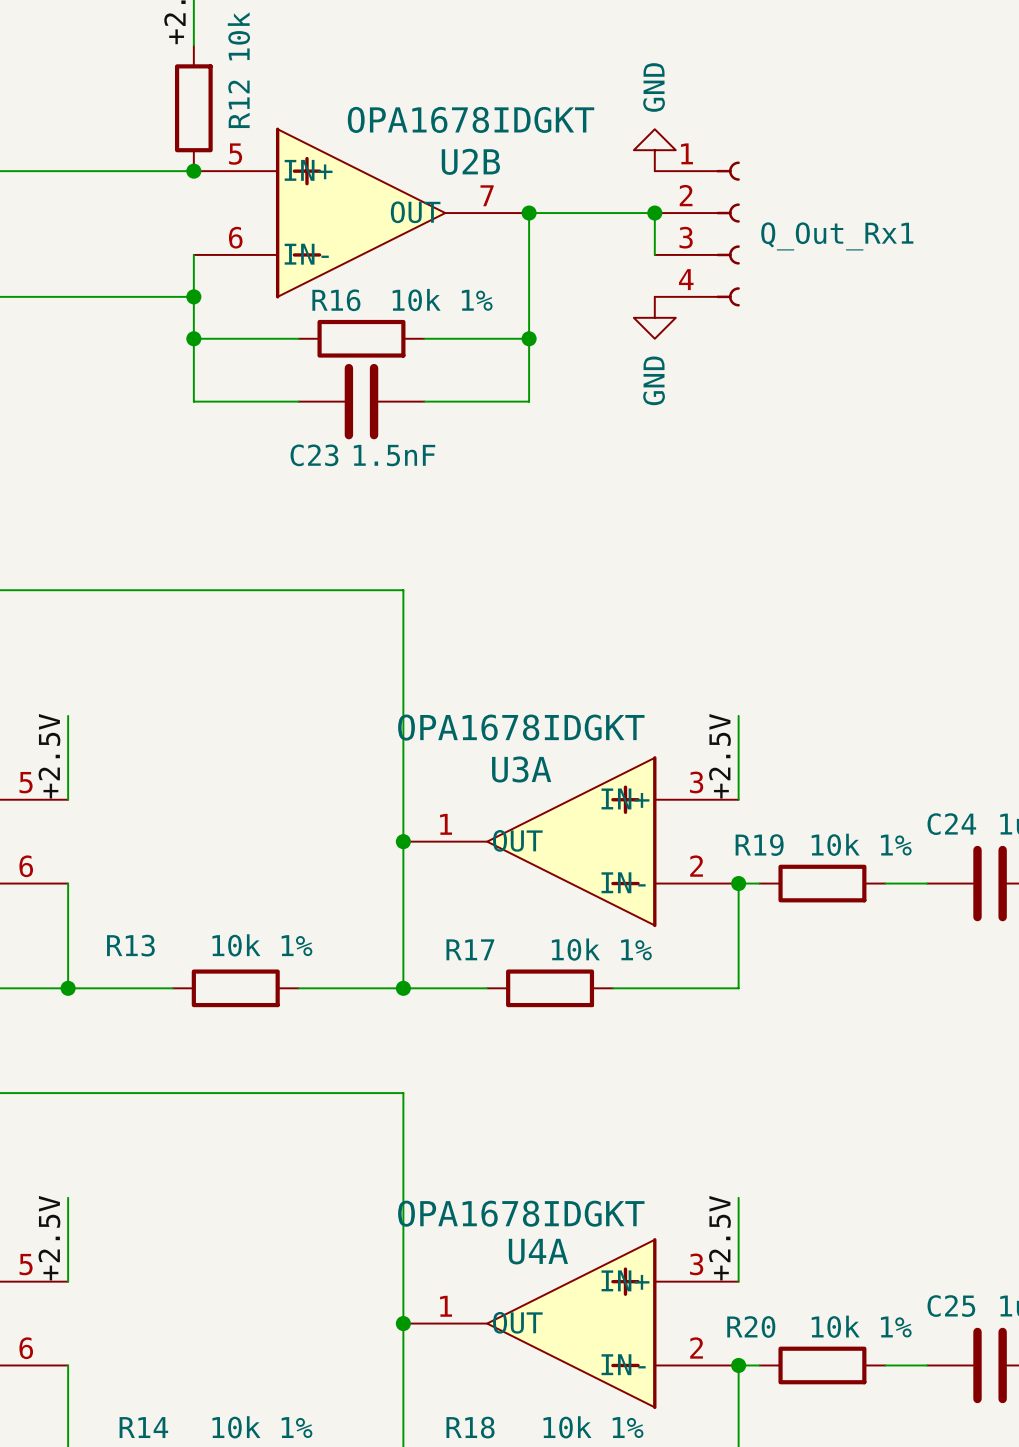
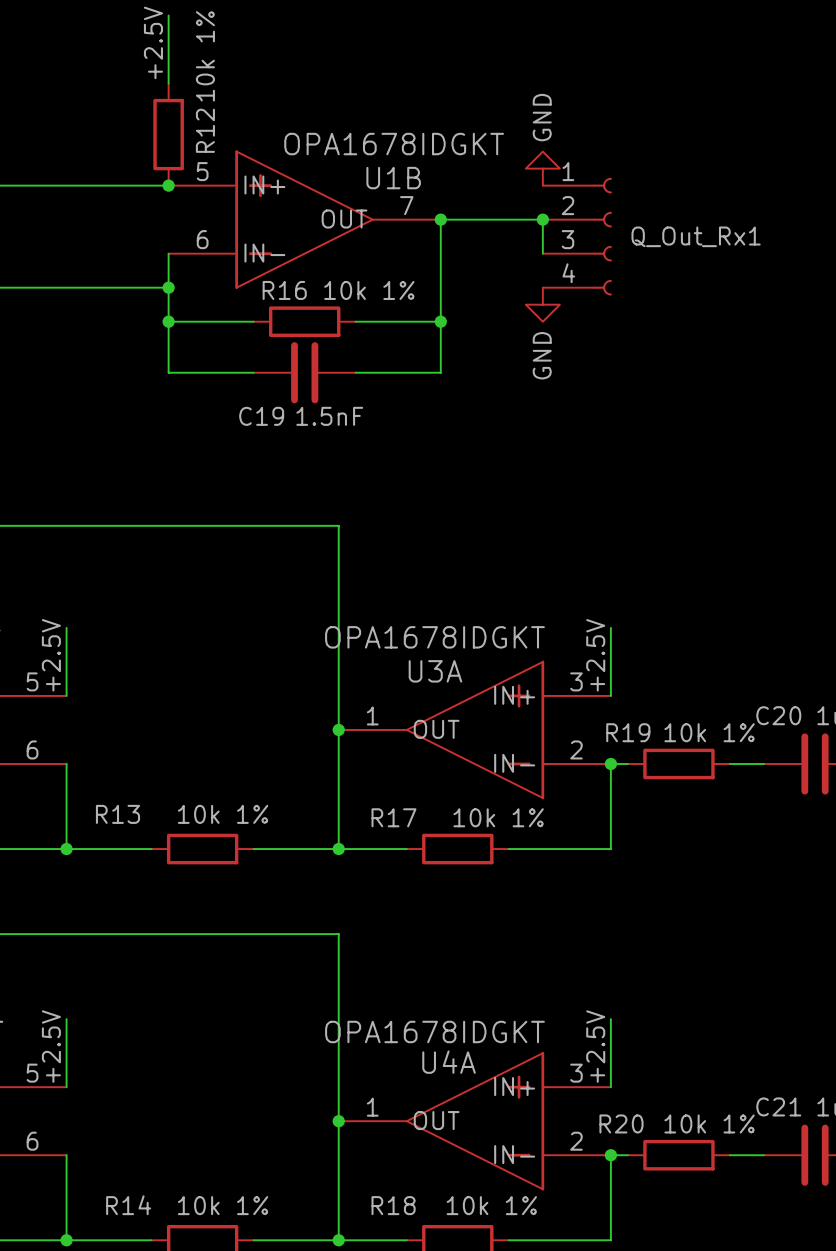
U2B name: U2B (470, 161) -> U1B (393, 178)
C23 name: C23 (314, 455) -> C19 (261, 416)
C24 name: C24 (951, 824) -> C20 (778, 715)
C25 name: C25 (951, 1306) -> C21 (778, 1106)

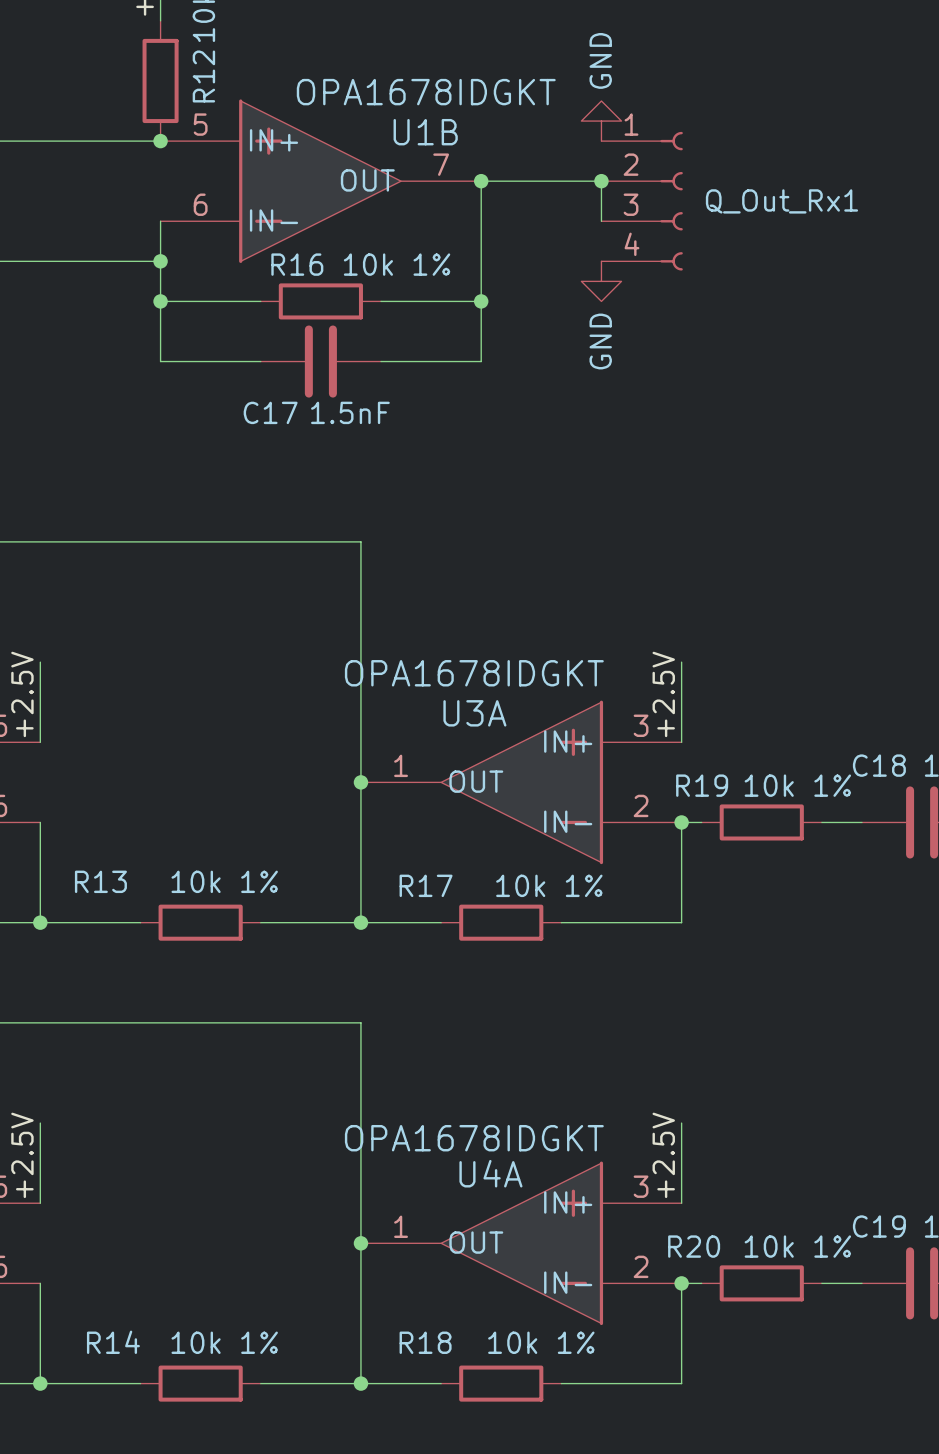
C19 name: C19 (261, 416) -> C17 (270, 412)
C20 name: C20 (778, 715) -> C18 (879, 765)
C21 name: C21 (778, 1106) -> C19 (879, 1226)

